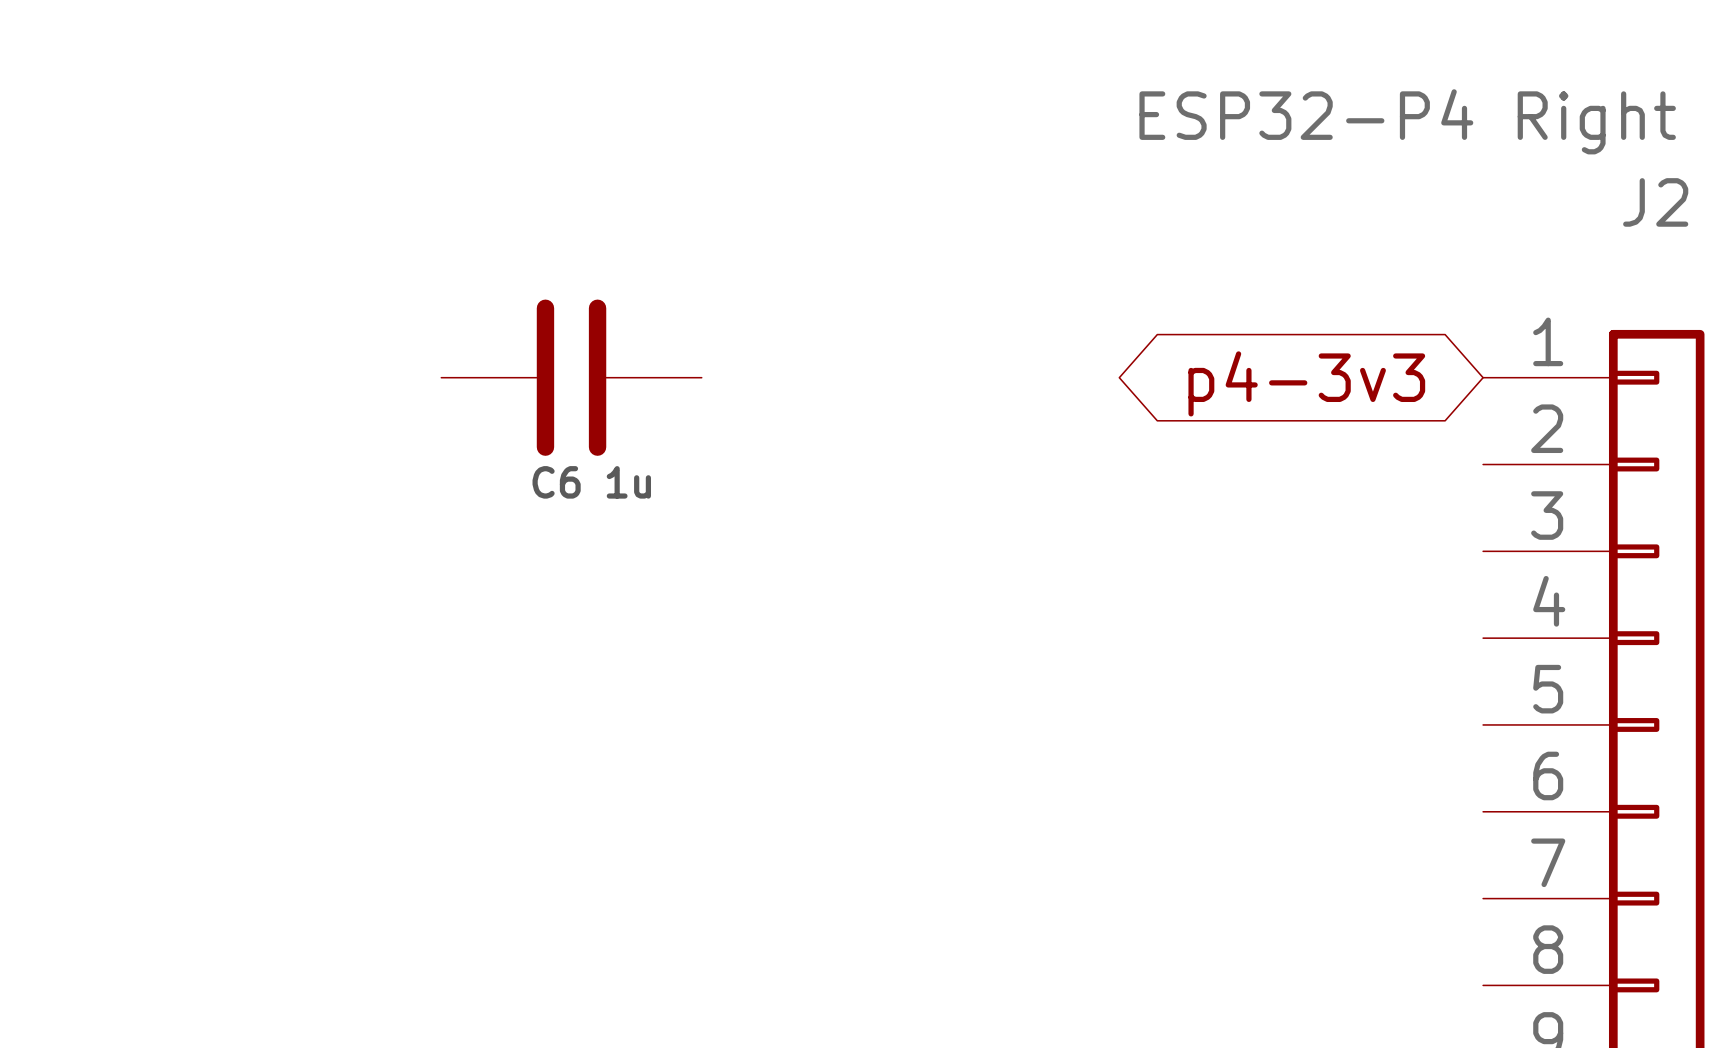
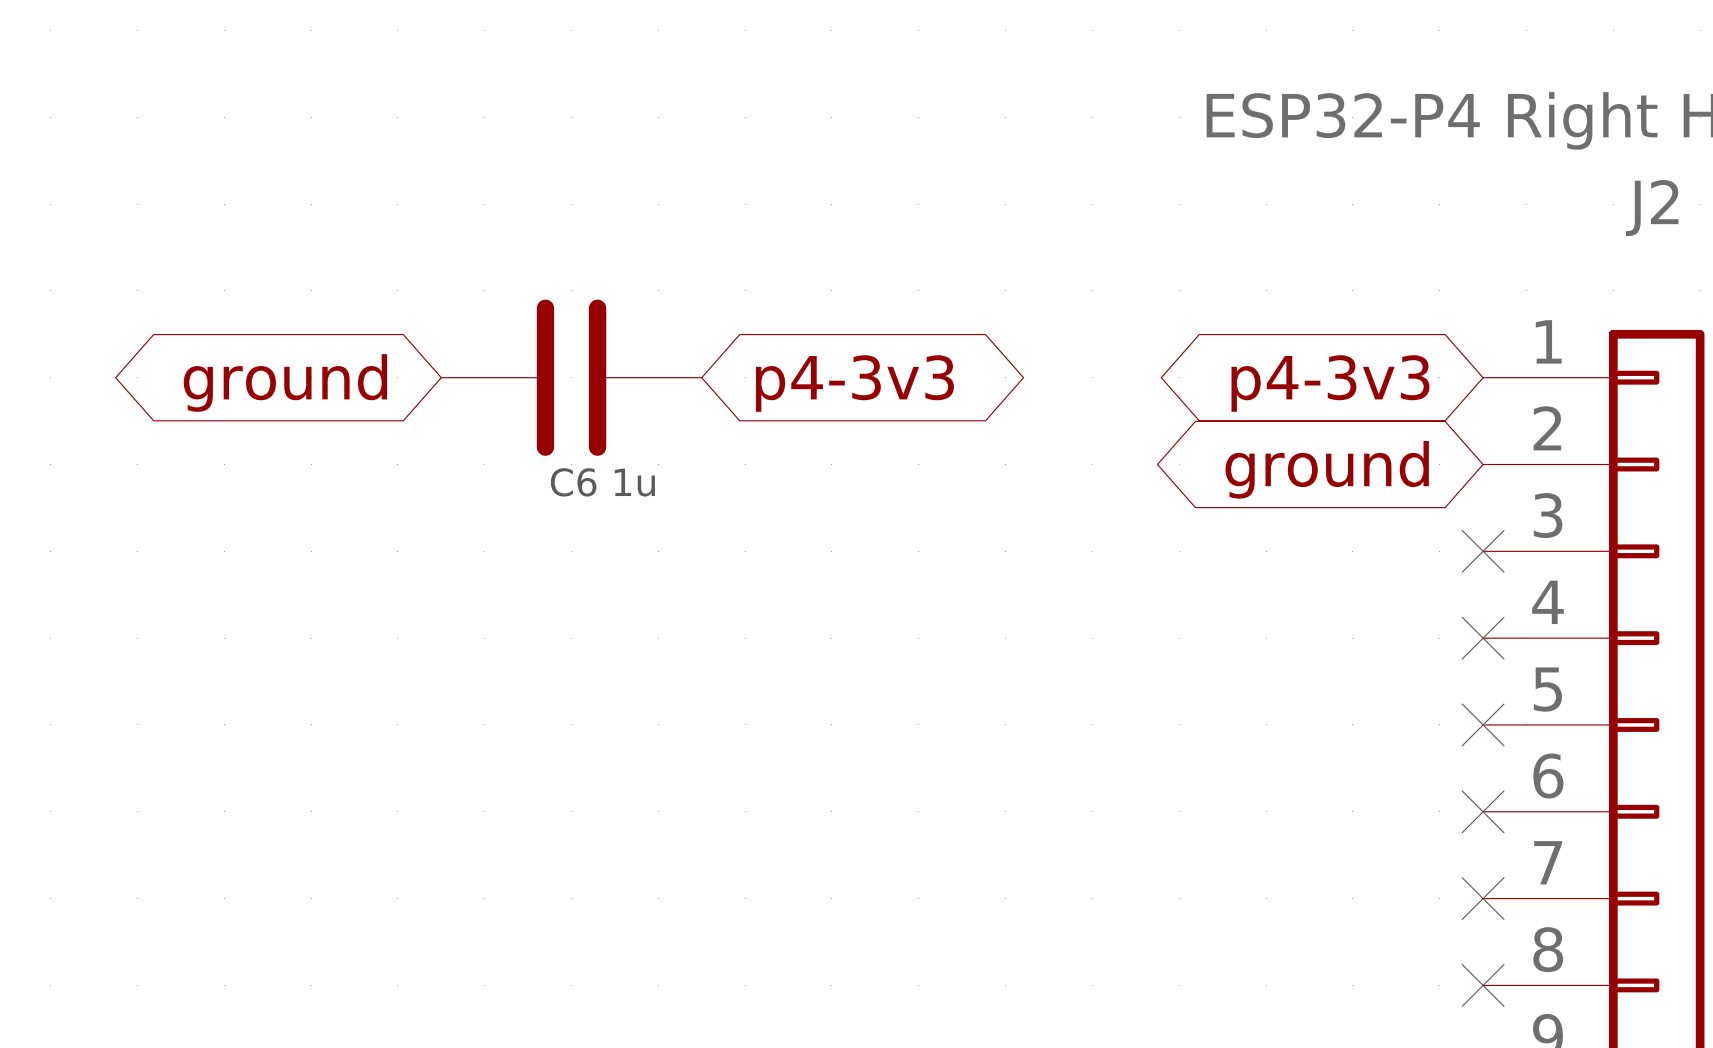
global label: none -> p4-3v3 (854, 383)
global label: none -> ground (285, 382)
global label: none -> ground (1327, 469)
no-connect mark: none -> (1483, 551)
no-connect mark: none -> (1483, 638)
no-connect mark: none -> (1483, 724)
no-connect mark: none -> (1483, 811)
no-connect mark: none -> (1483, 898)
no-connect mark: none -> (1483, 985)

